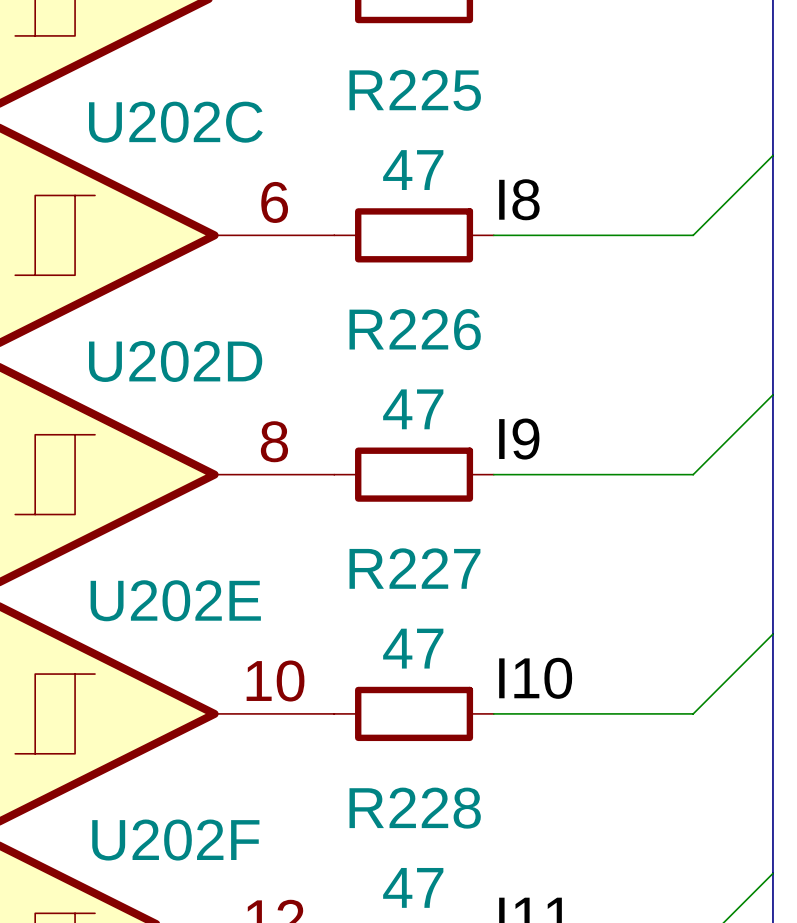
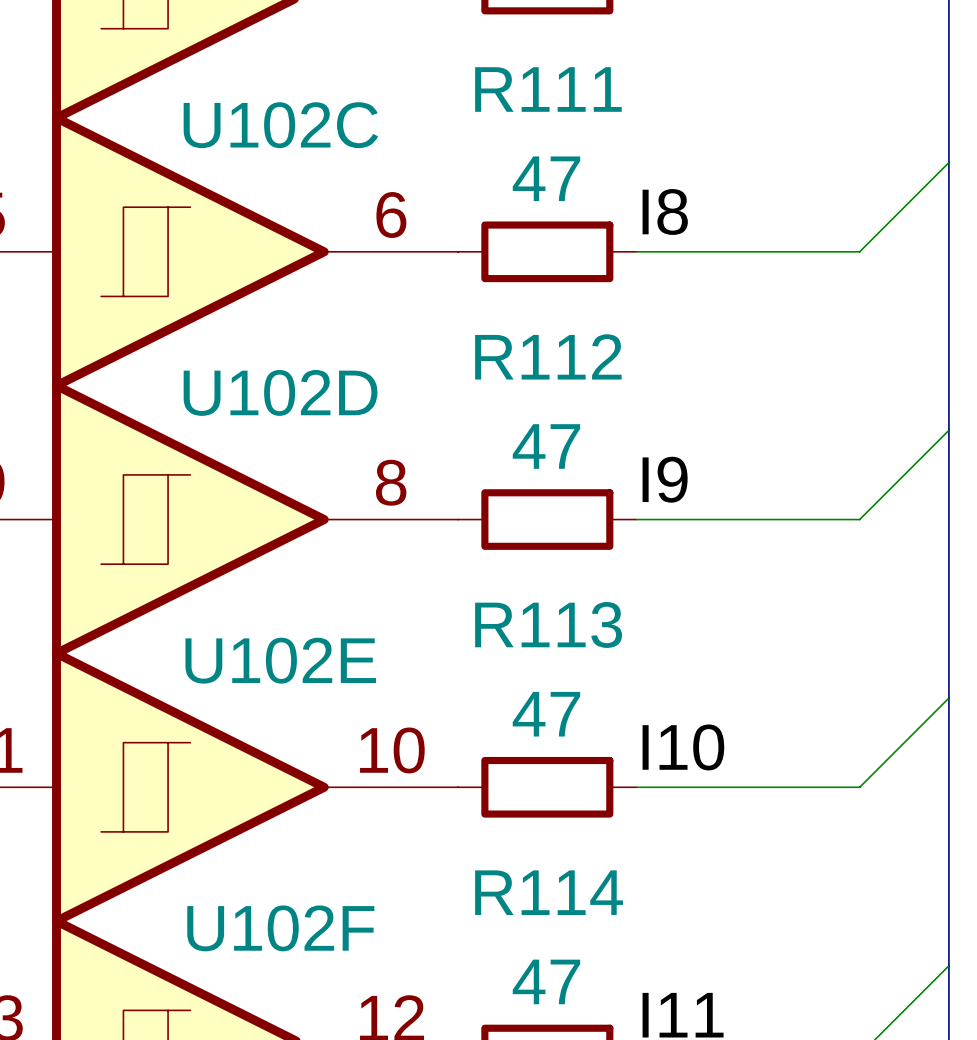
R225 name: R225 (415, 90) -> R111 (548, 89)
U202C name: U202C (175, 122) -> U102C (280, 125)
R226 name: R226 (415, 329) -> R112 (548, 356)
U202D name: U202D (175, 361) -> U102D (280, 392)
R227 name: R227 (414, 568) -> R113 (548, 624)
U202E name: U202E (175, 600) -> U102E (280, 660)
R228 name: R228 (415, 808) -> R114 (549, 892)
U202F name: U202F (175, 840) -> U102F (280, 928)

